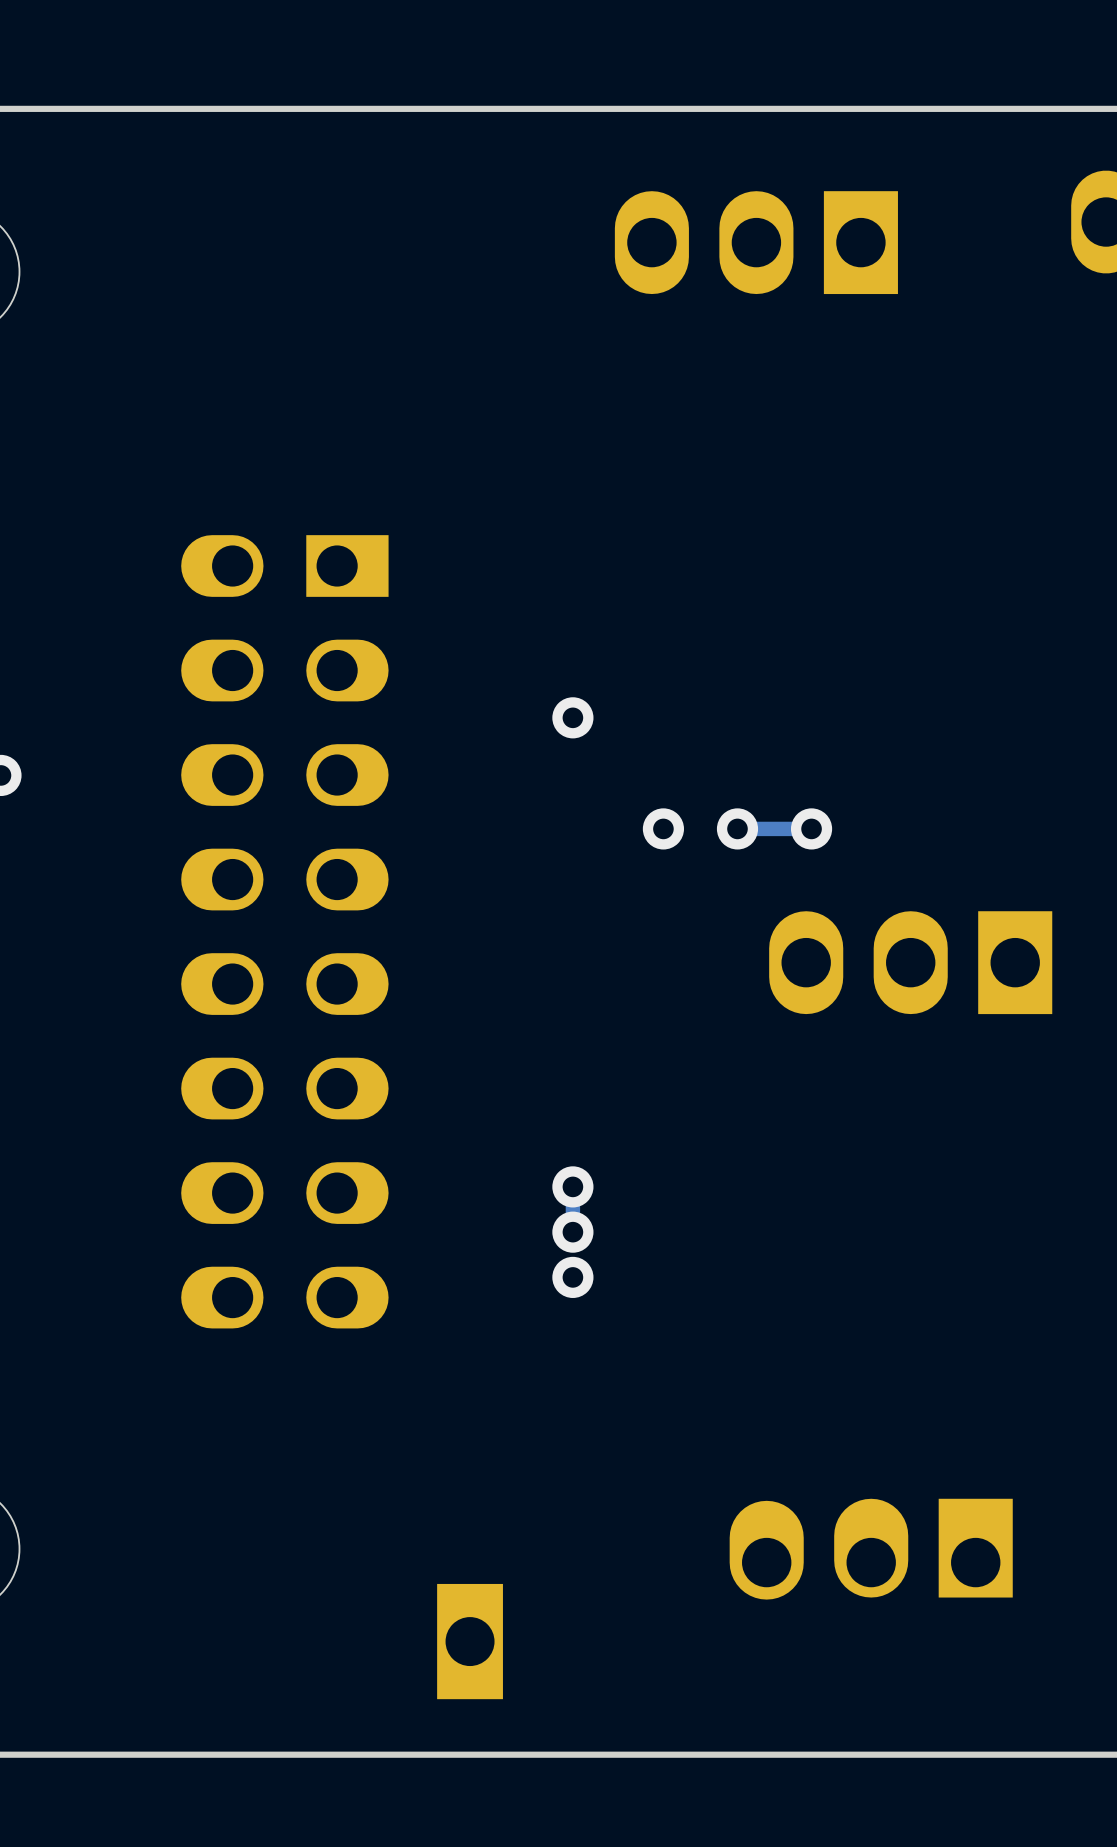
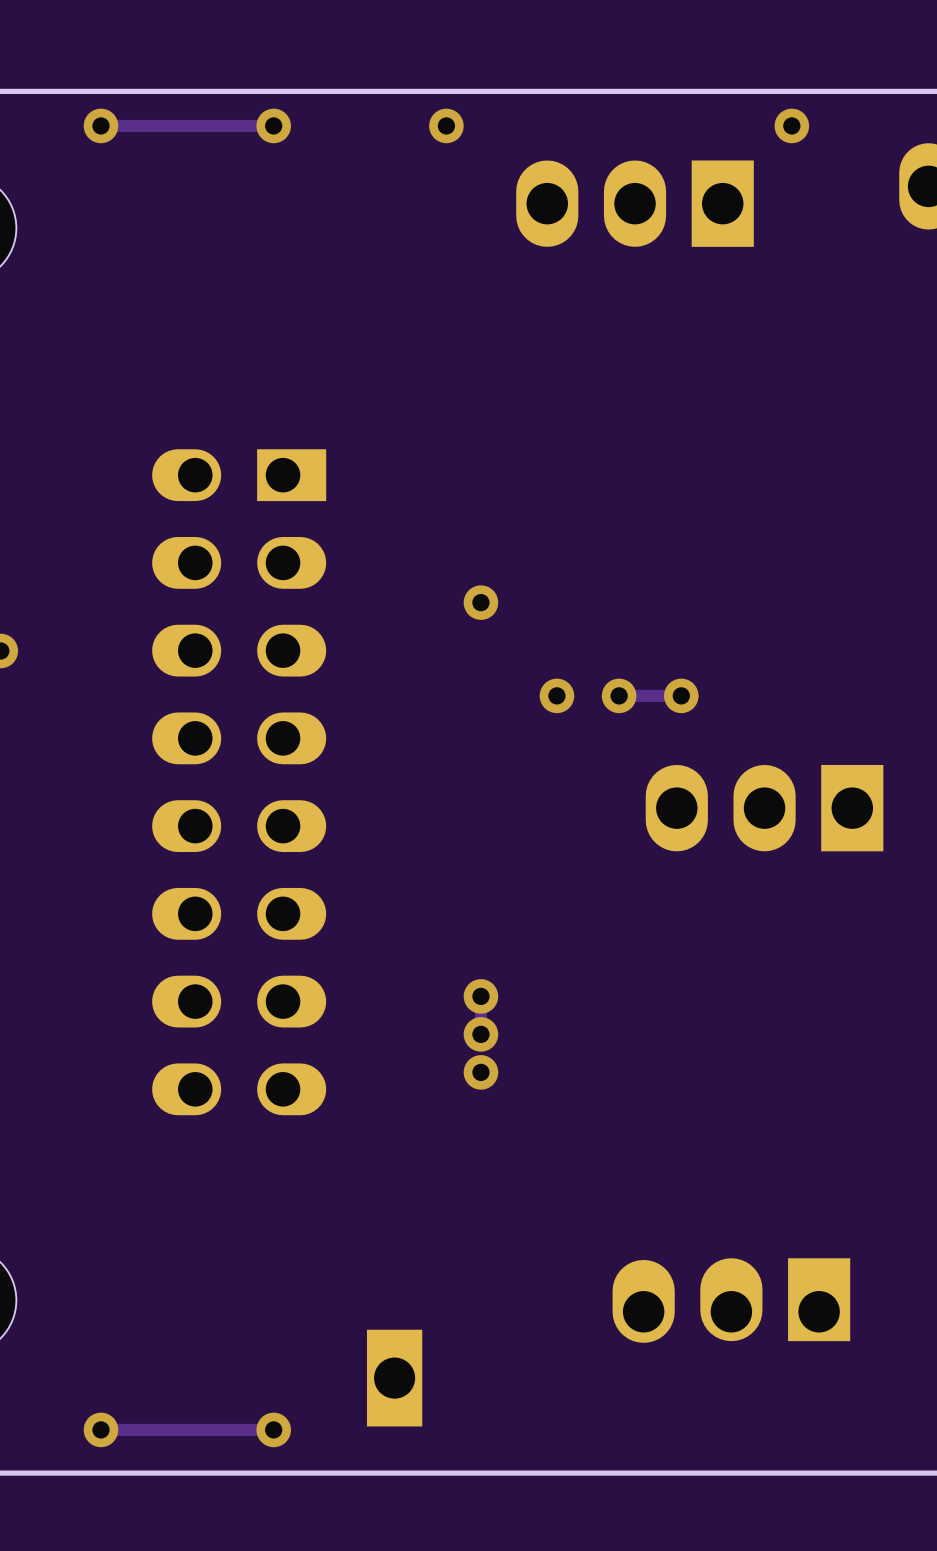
via: none -> (100, 125)
track: none -> (273, 125) (100, 125)
via: none -> (273, 125)
via: none -> (446, 125)
via: none -> (791, 125)
via: none -> (100, 1429)
track: none -> (273, 1429) (100, 1429)
via: none -> (273, 1429)

